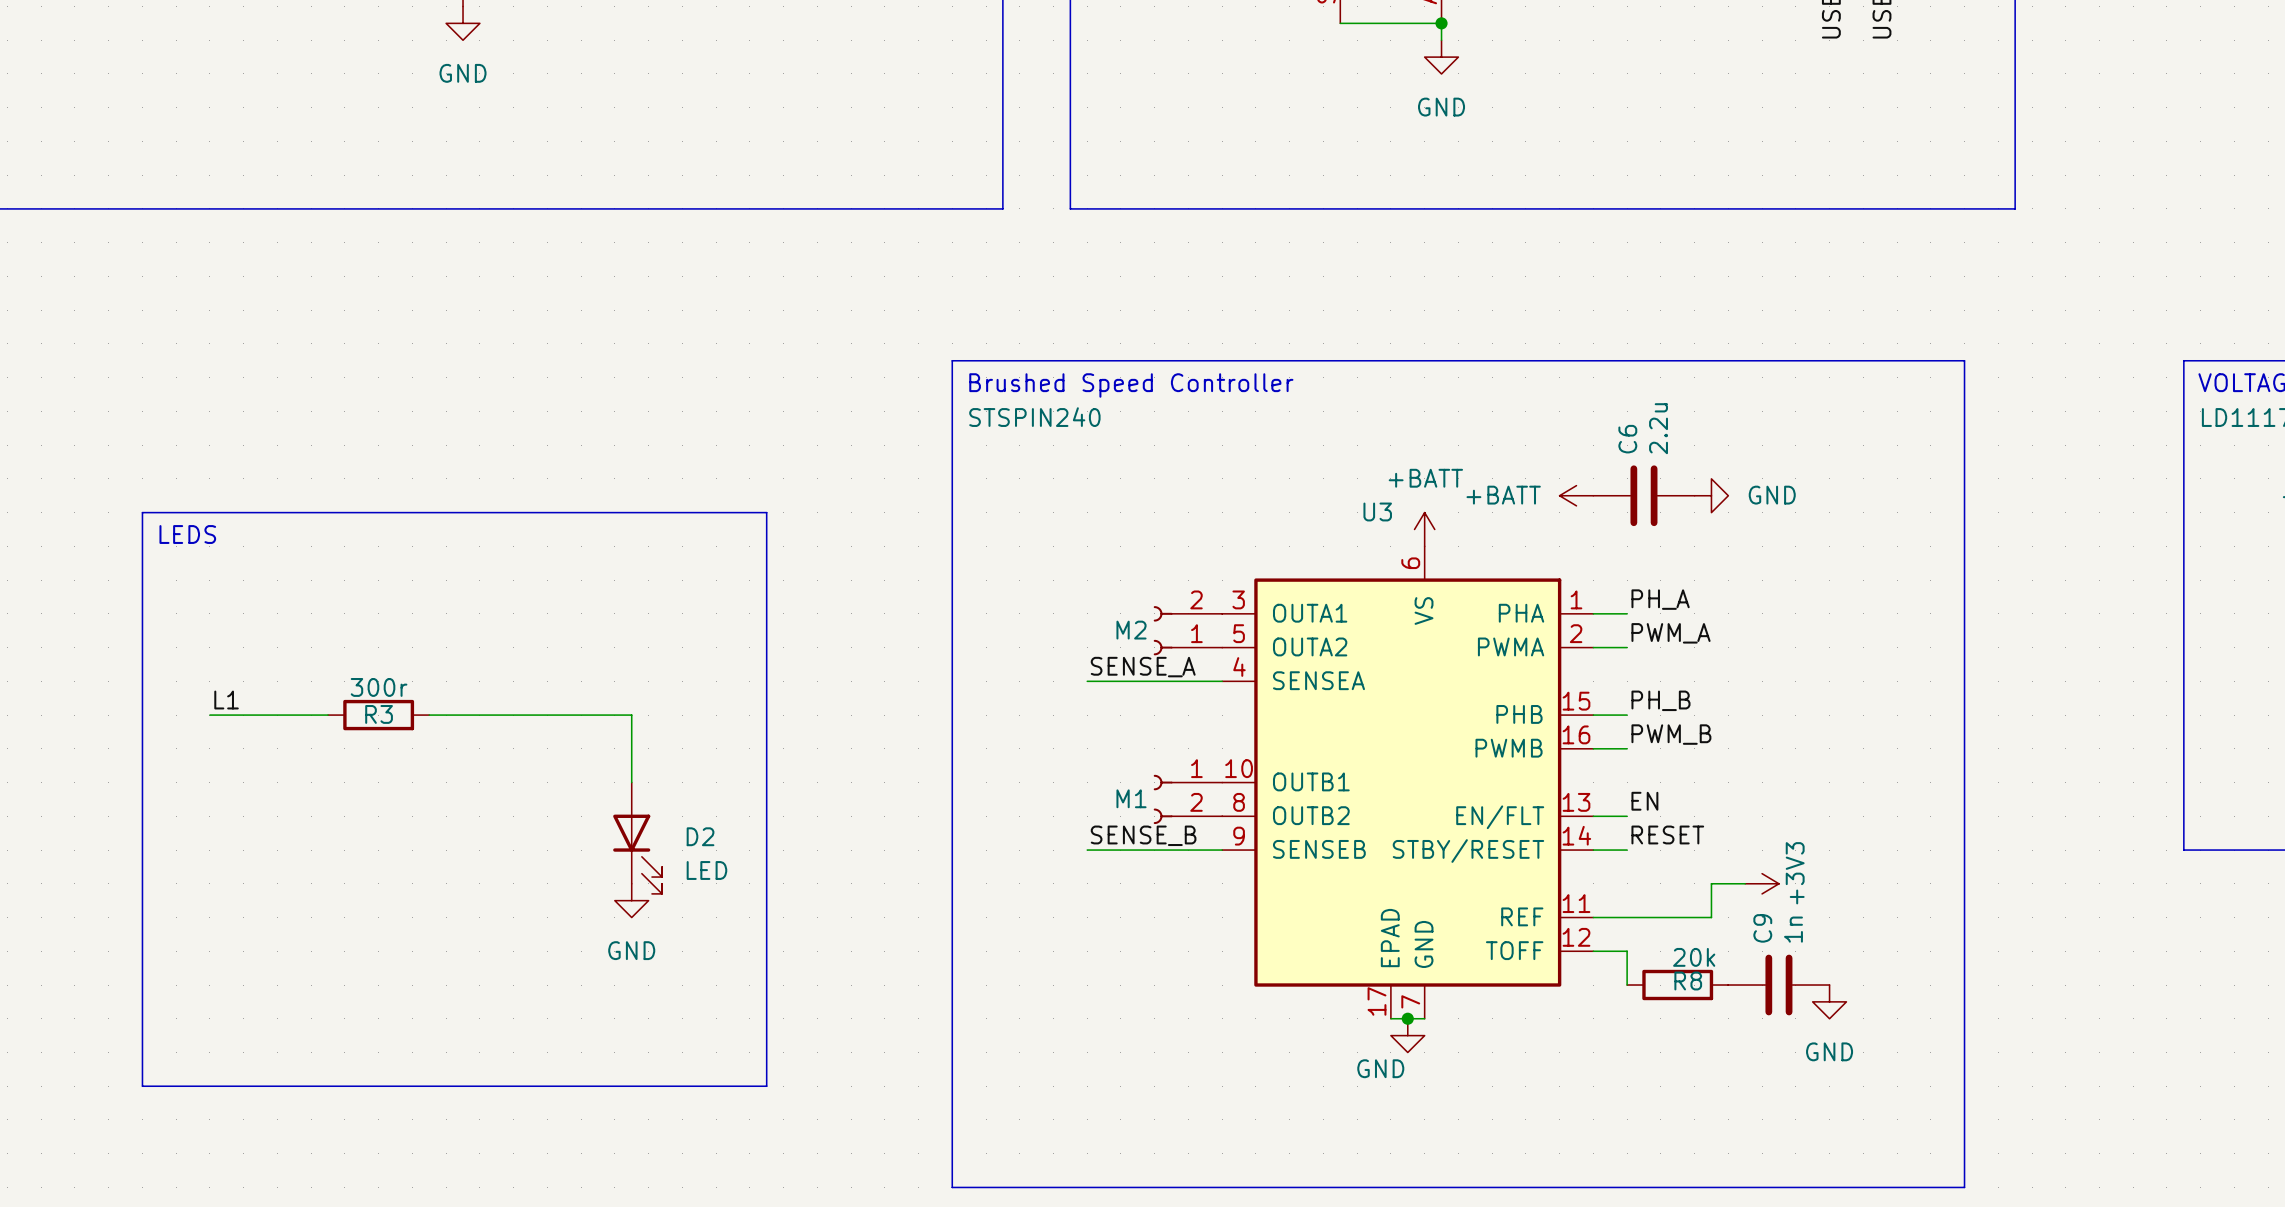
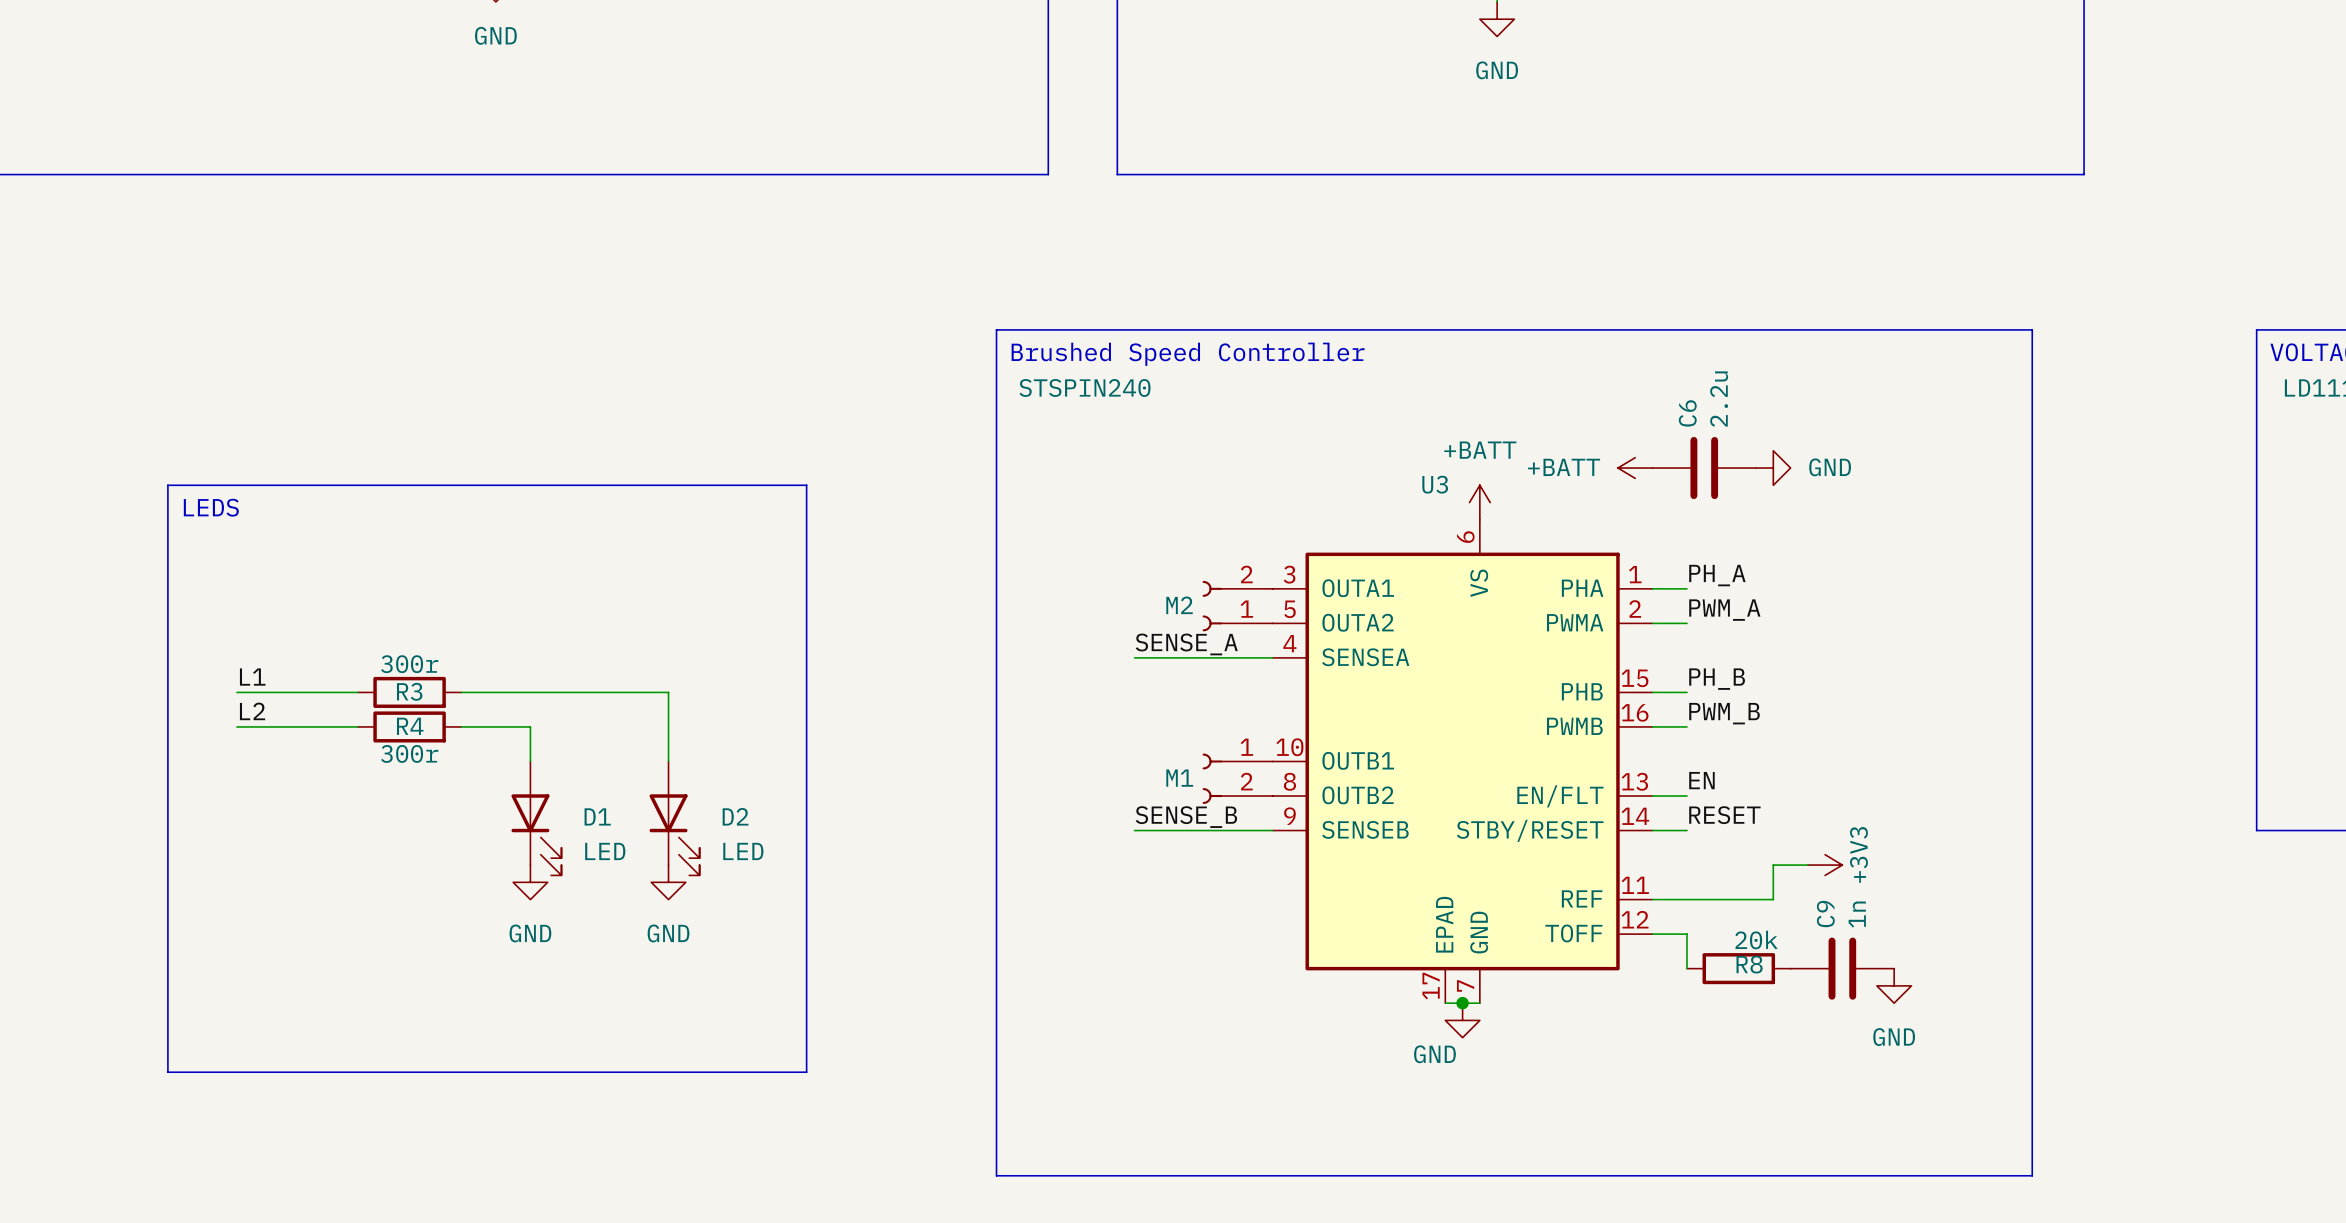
label: none -> L2 (252, 711)
wire: none -> (236, 726) (357, 726)
R4: none -> 300r (409, 726)
wire: none -> (461, 726) (530, 726) (530, 761)
D1: none -> LED (536, 818)
power symbol: none -> GND (530, 882)

